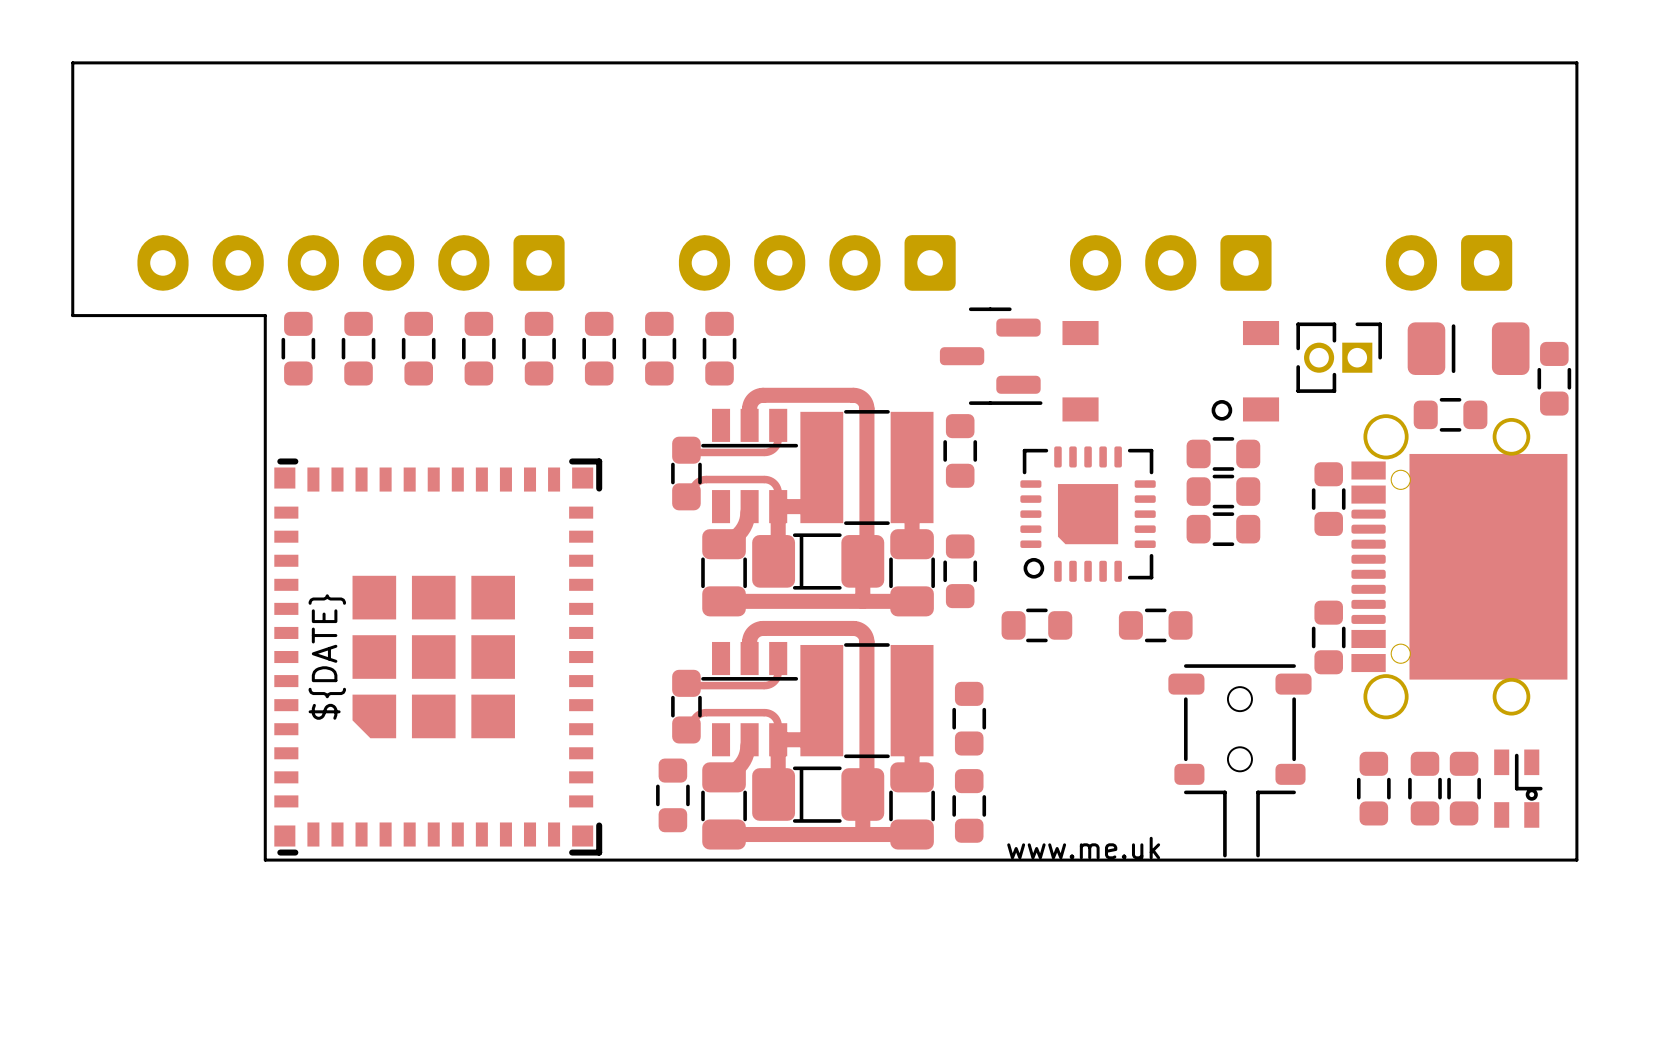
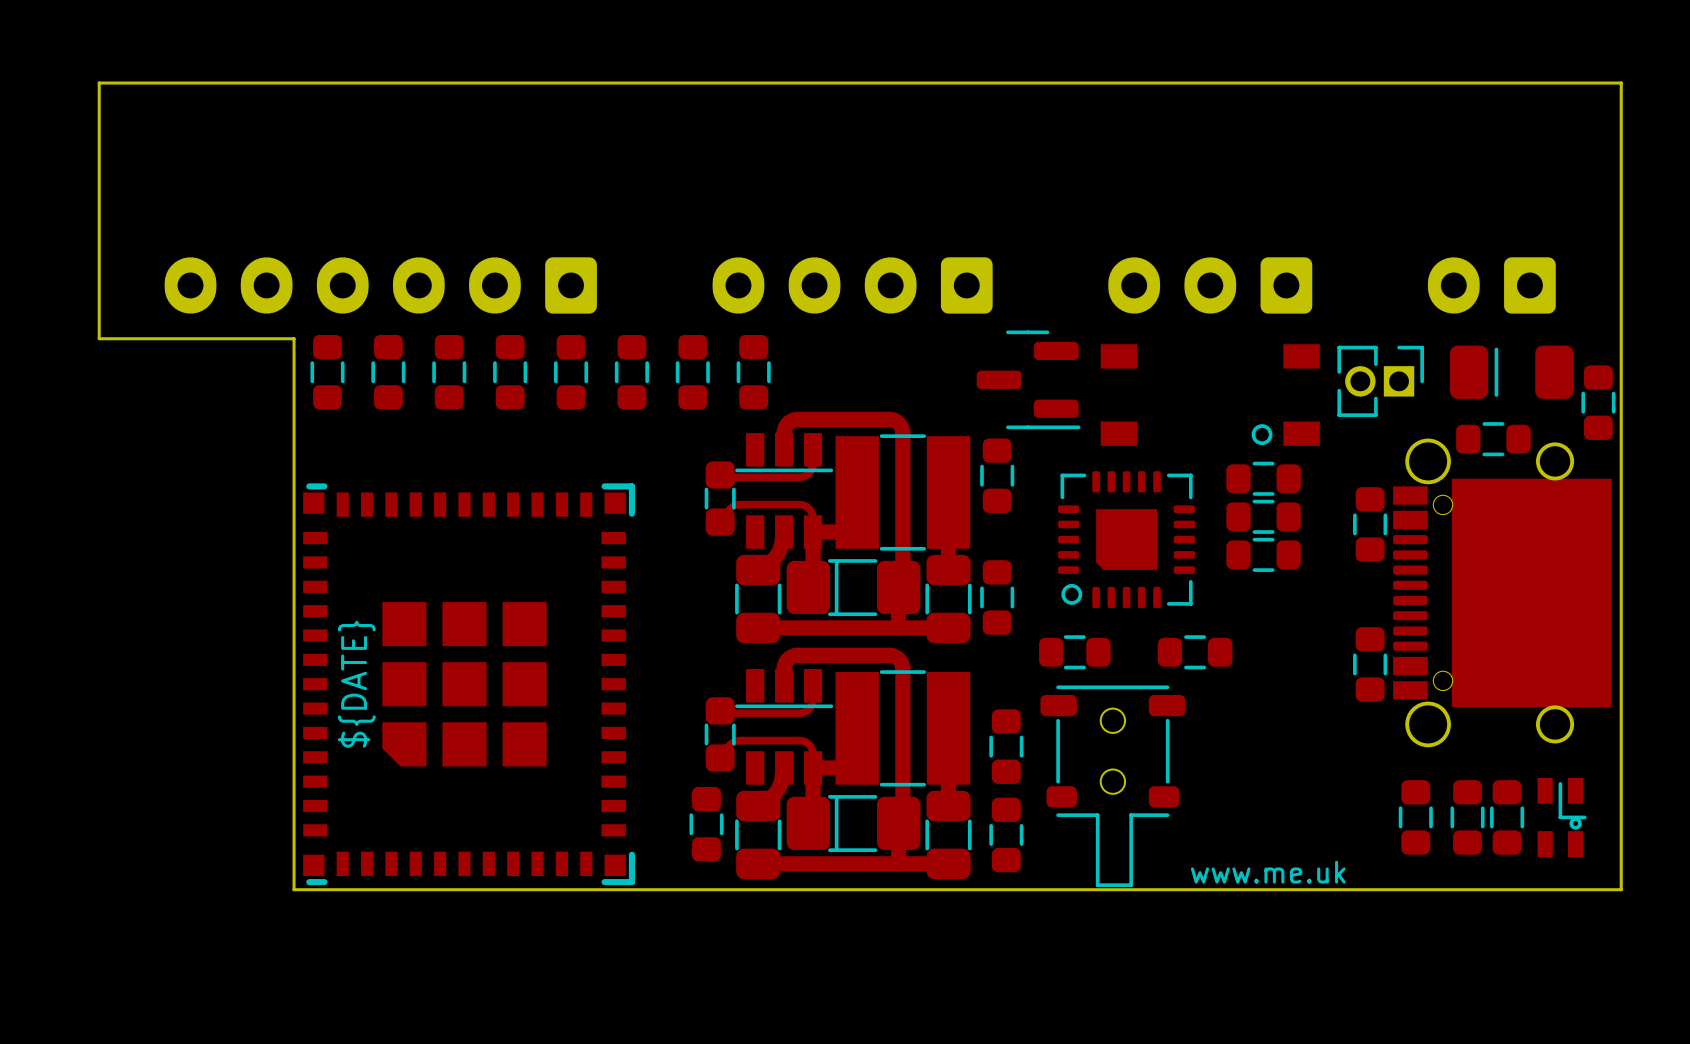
part: none -> (1112, 786)
part: (1239, 760) -> none
drawing position: (1083, 848) -> (1268, 872)

